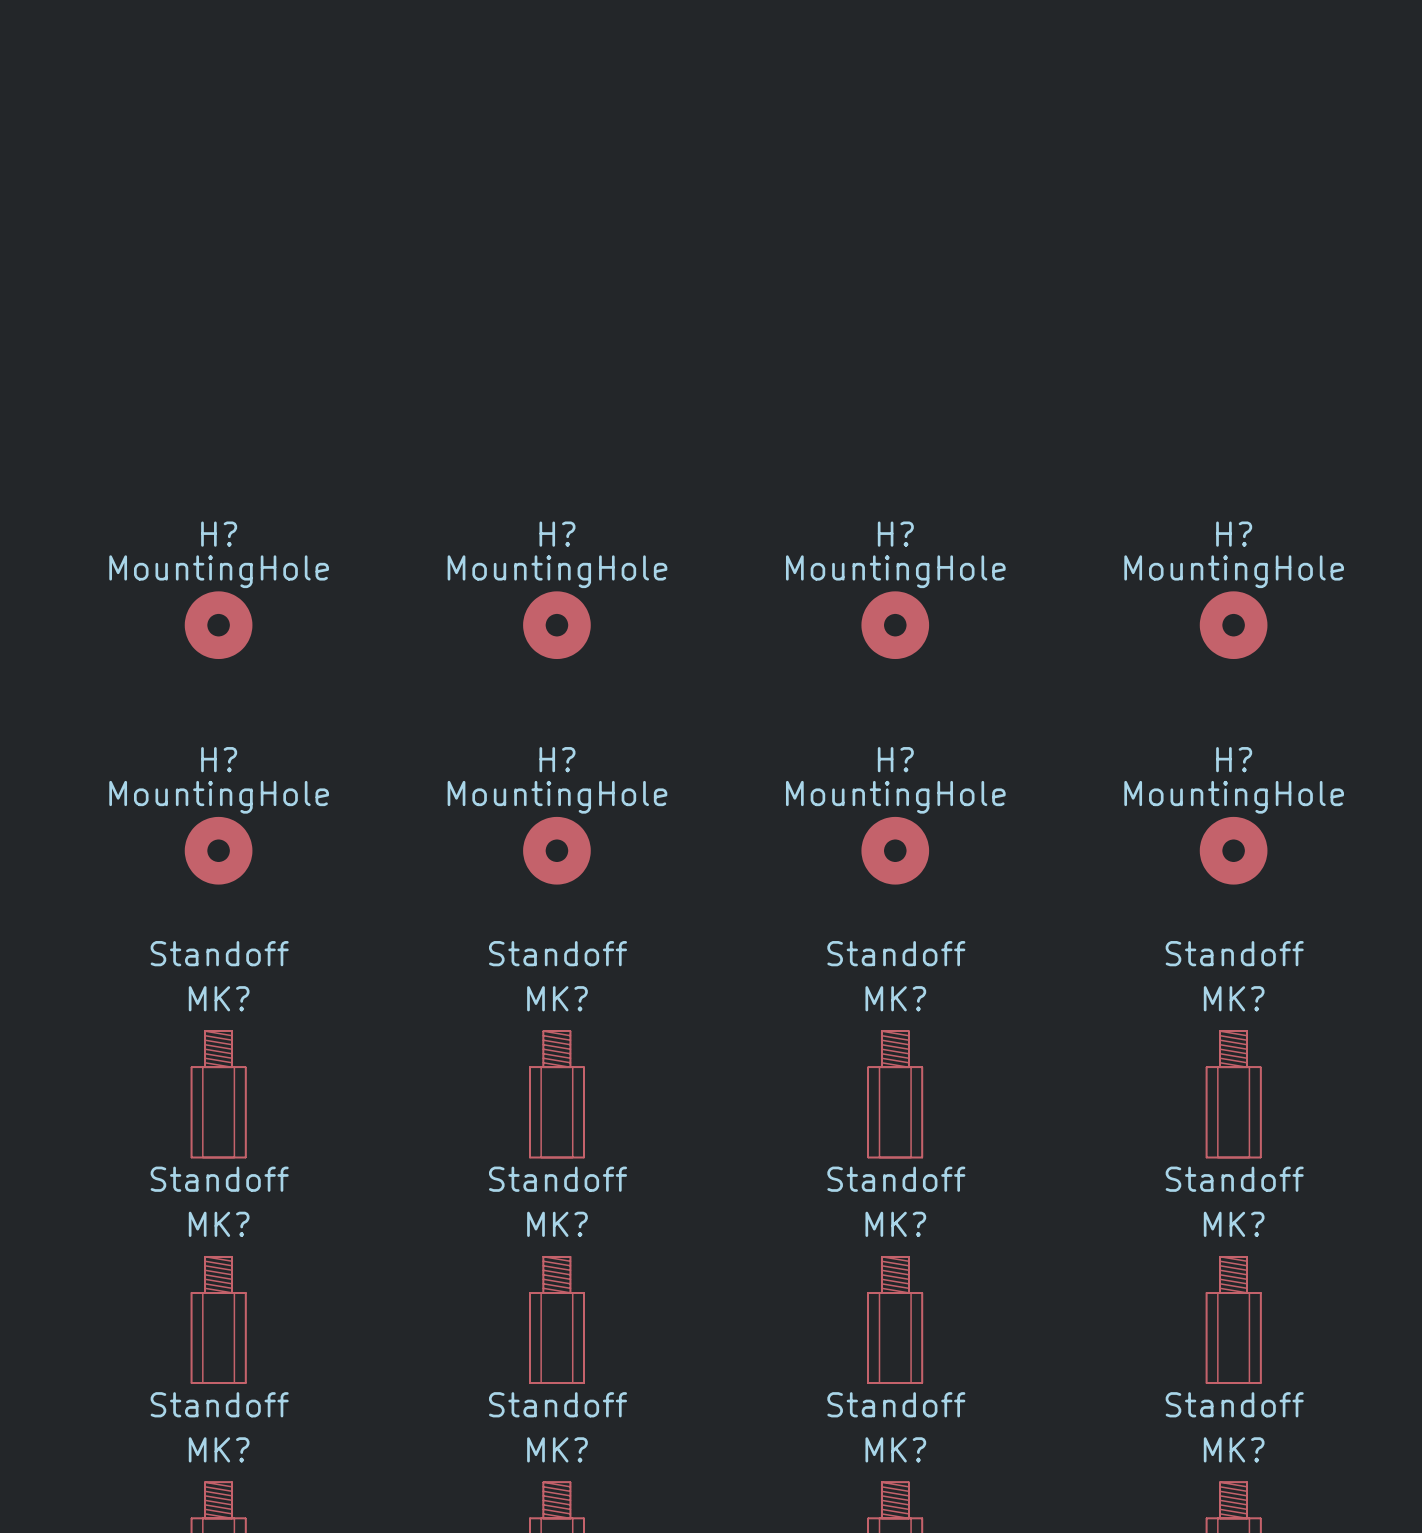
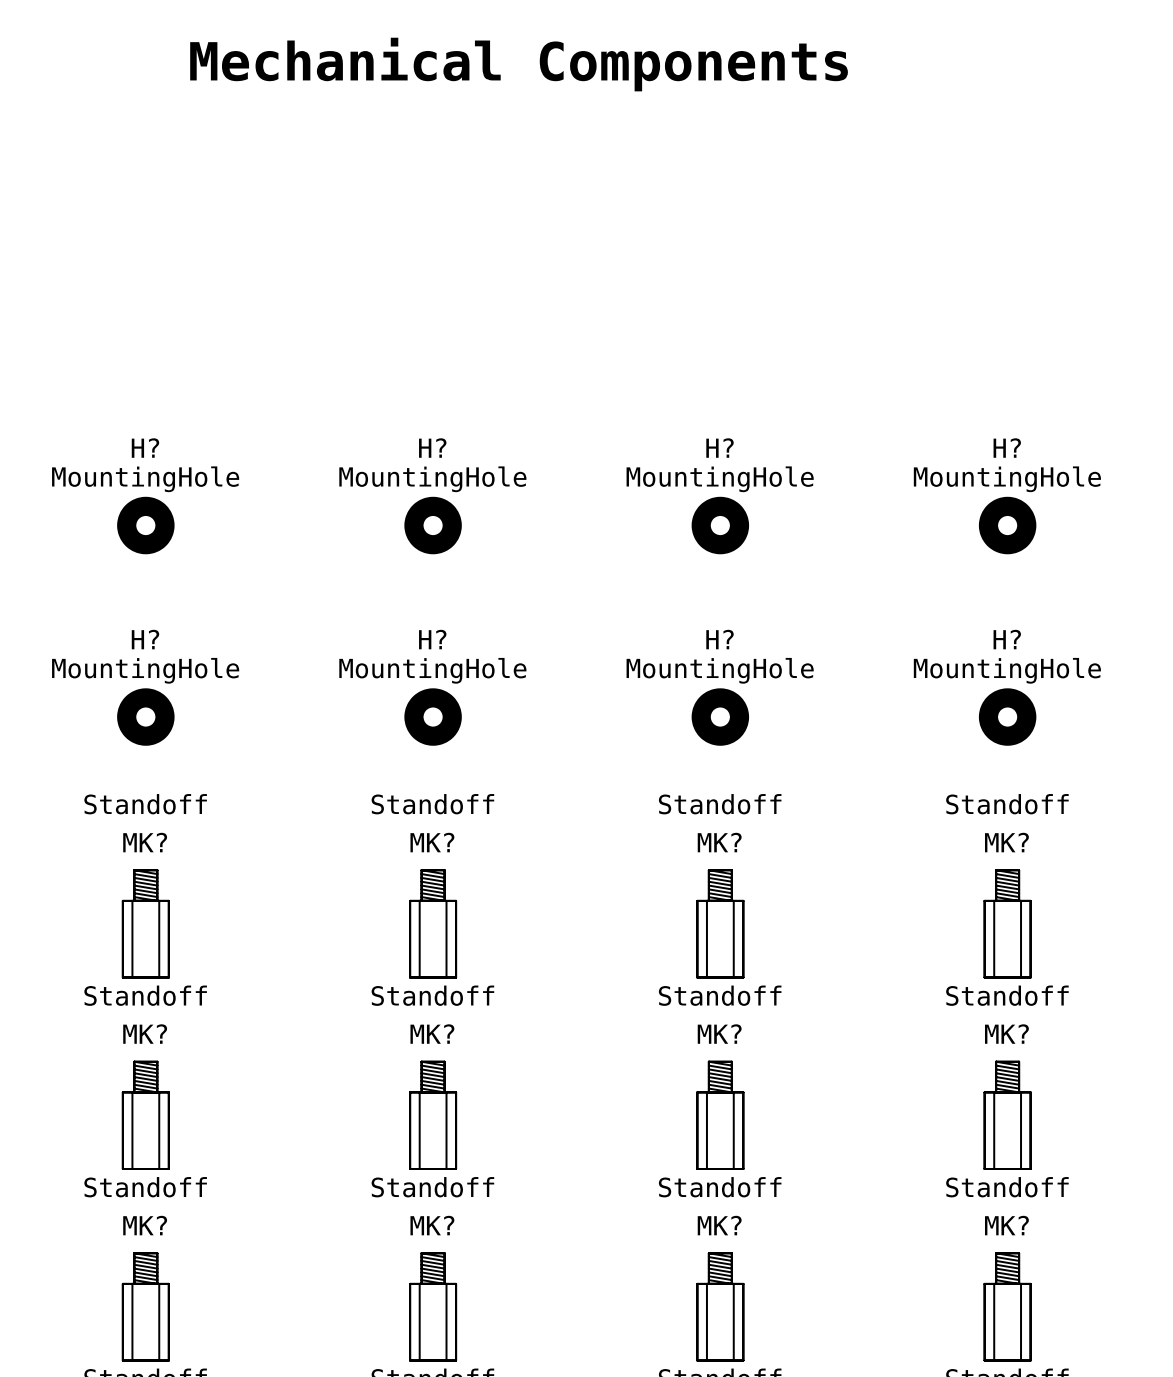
text: none -> Mechanical Components (519, 64)

